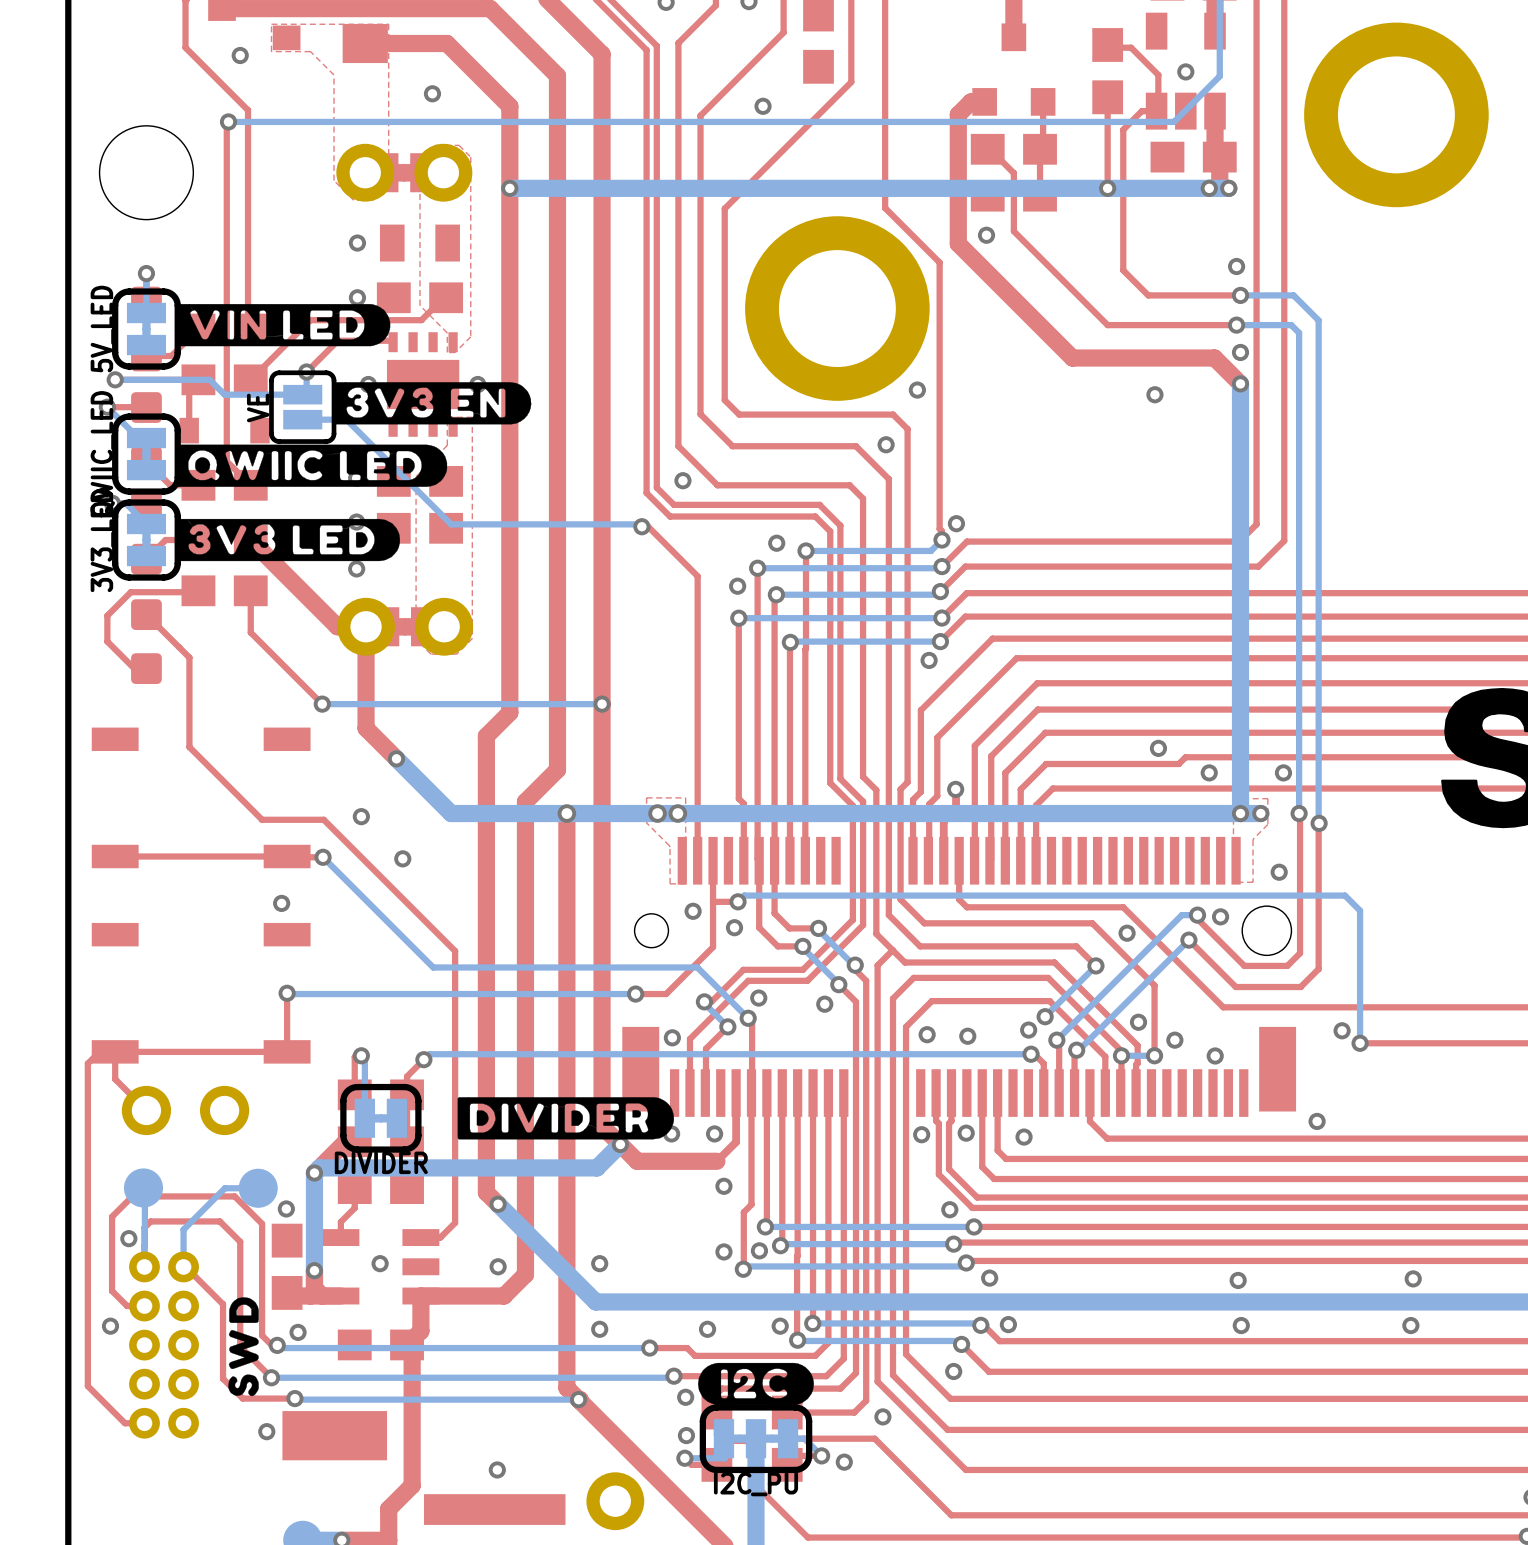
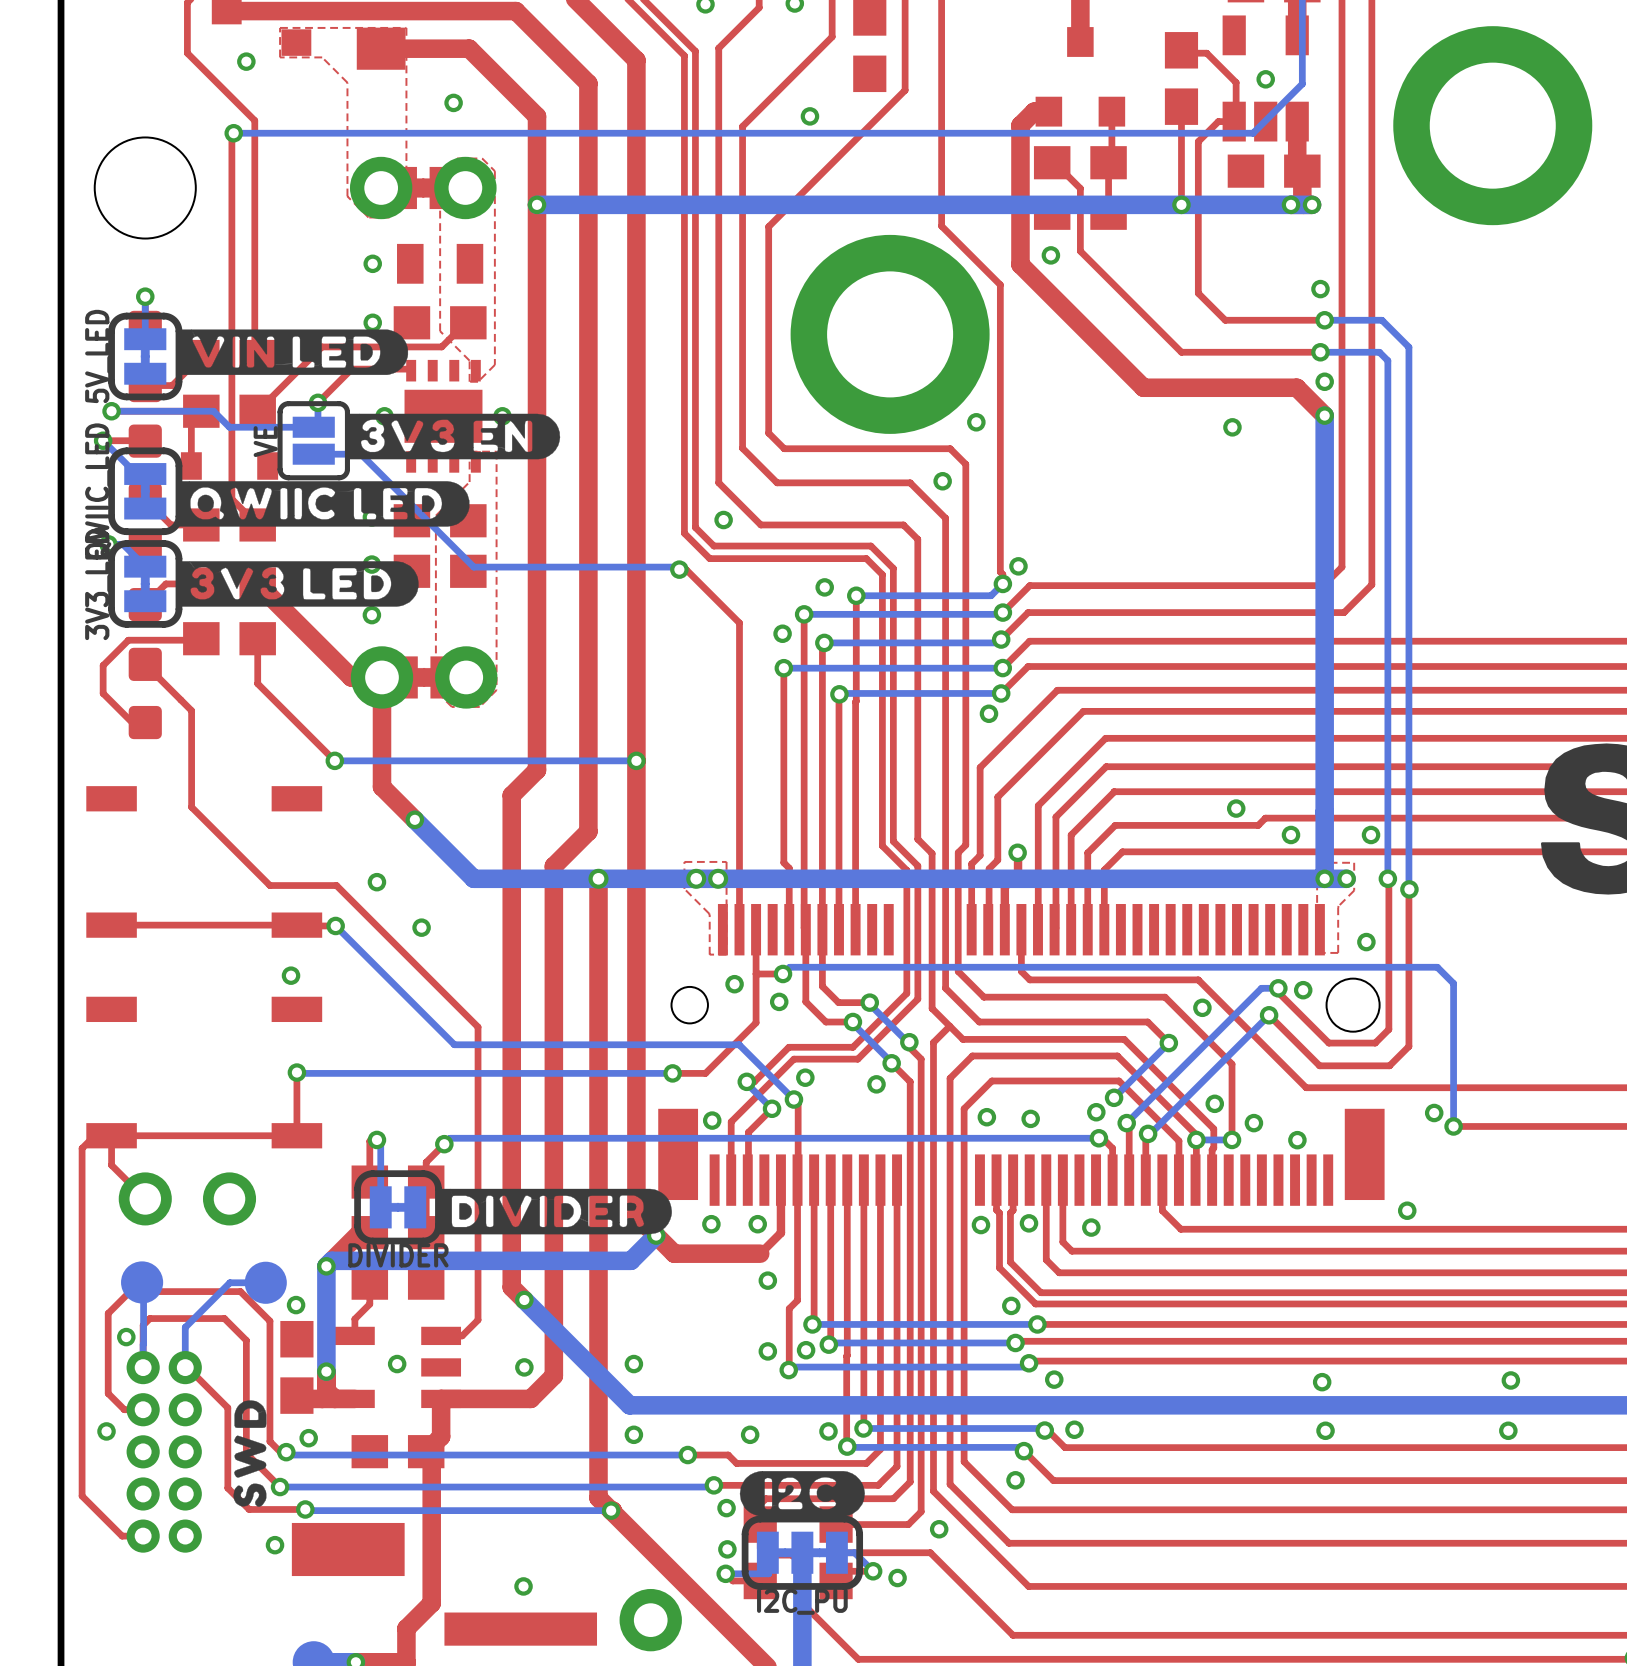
drawing position: (565, 1118) -> (555, 1211)

